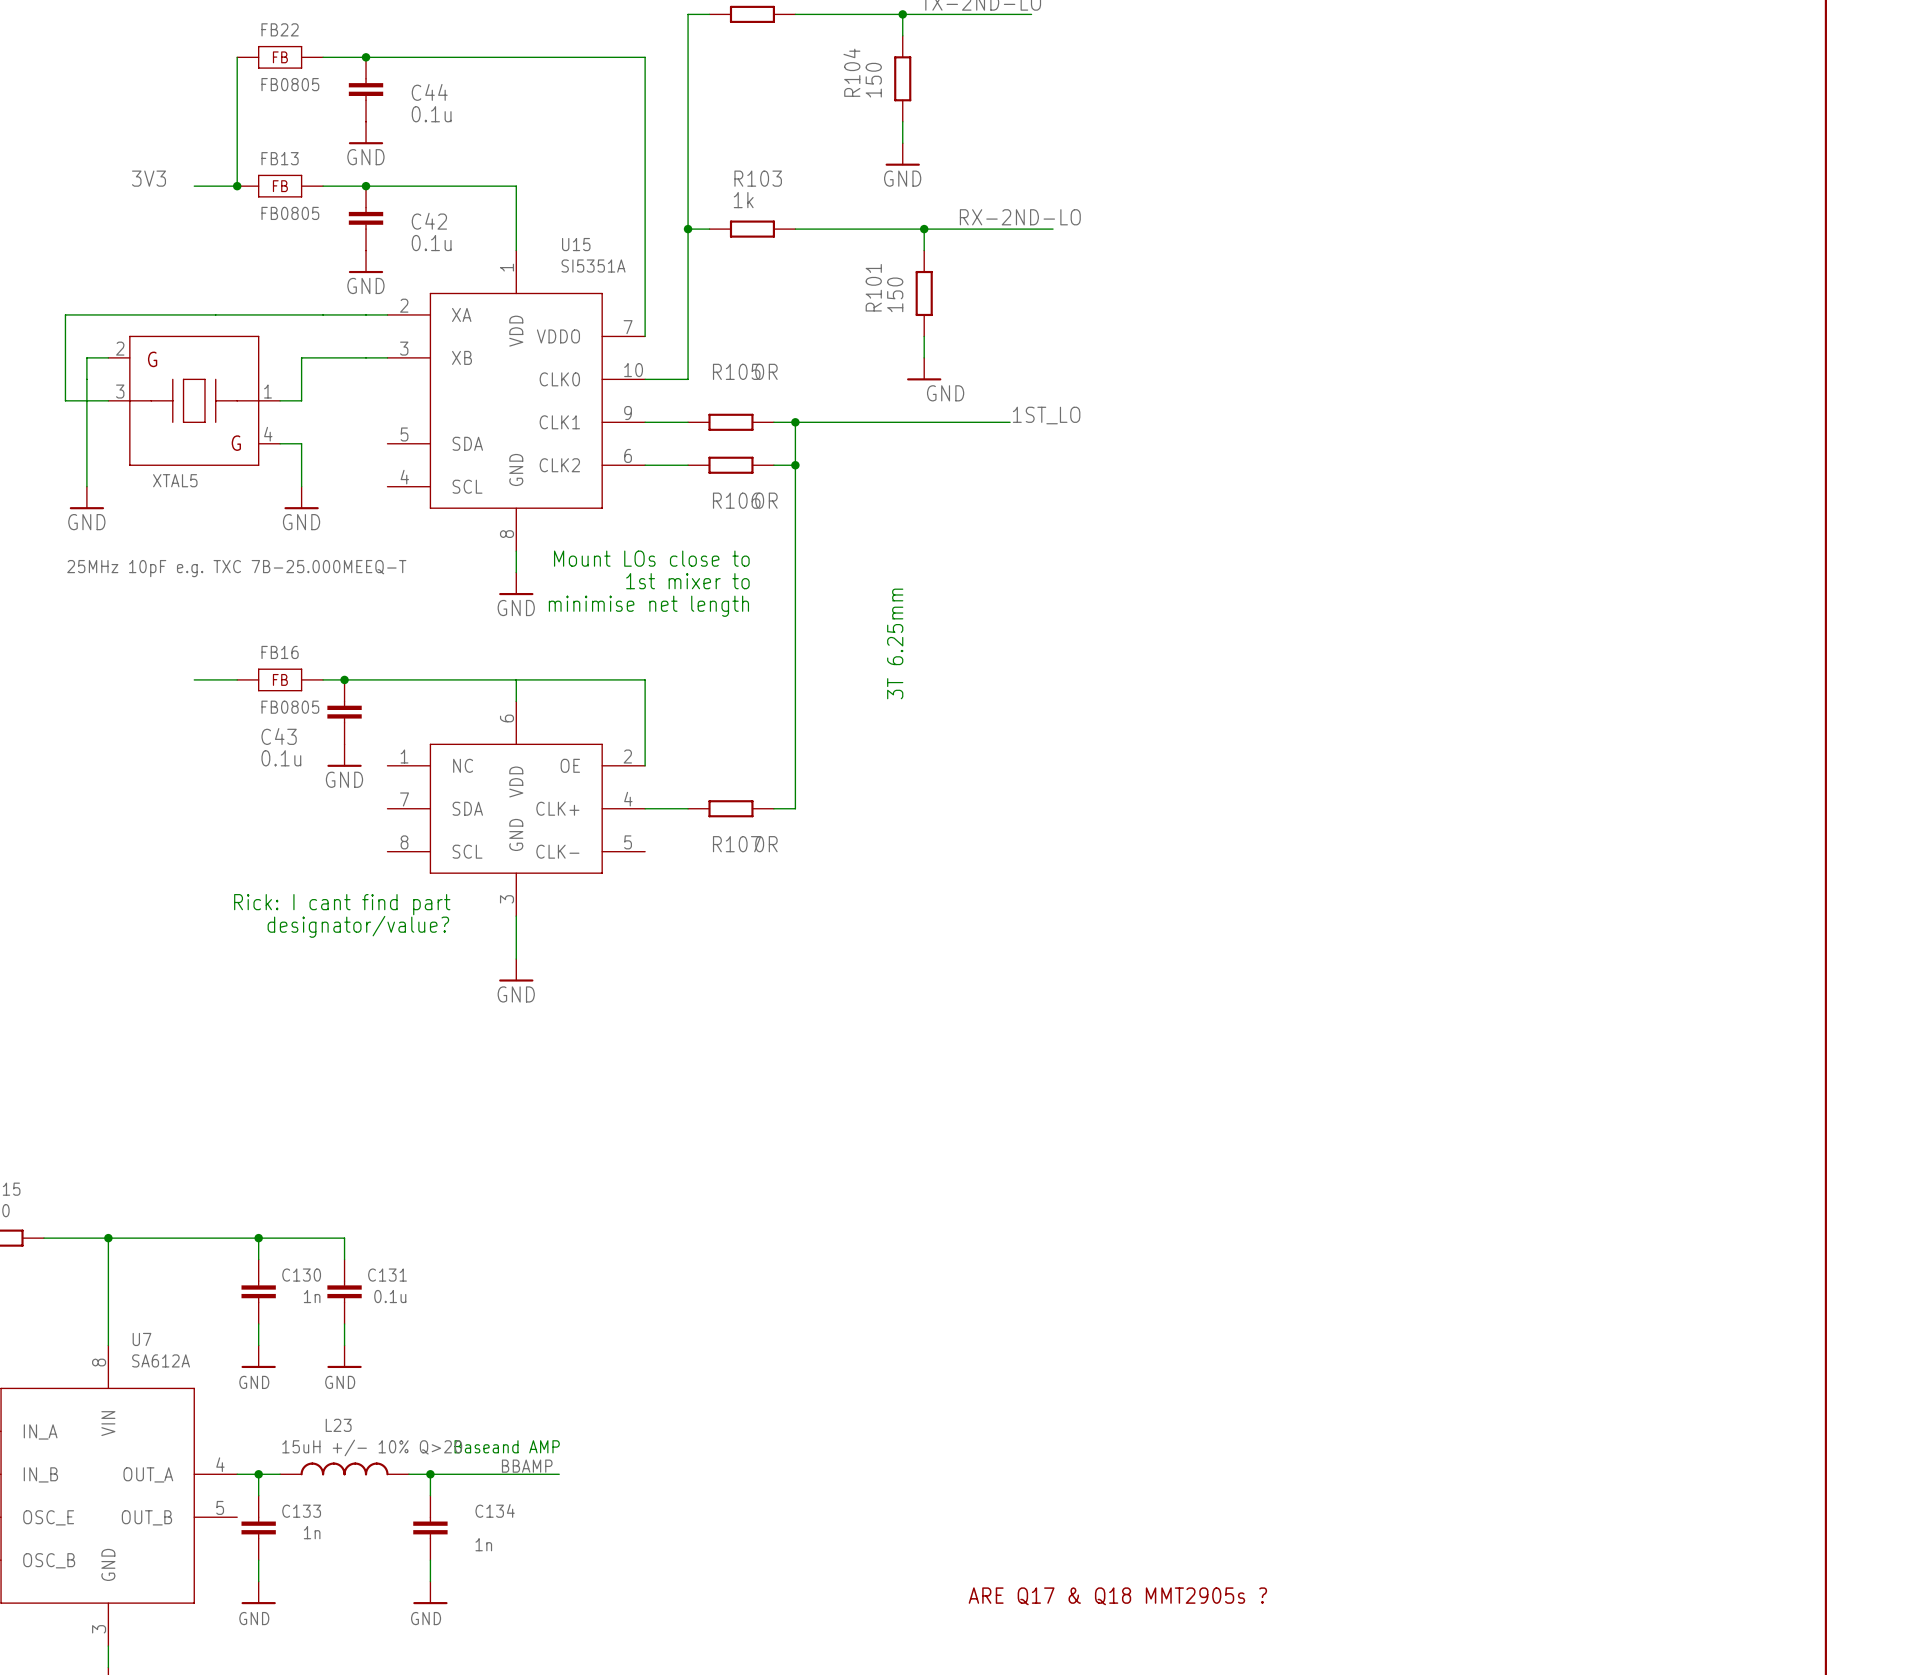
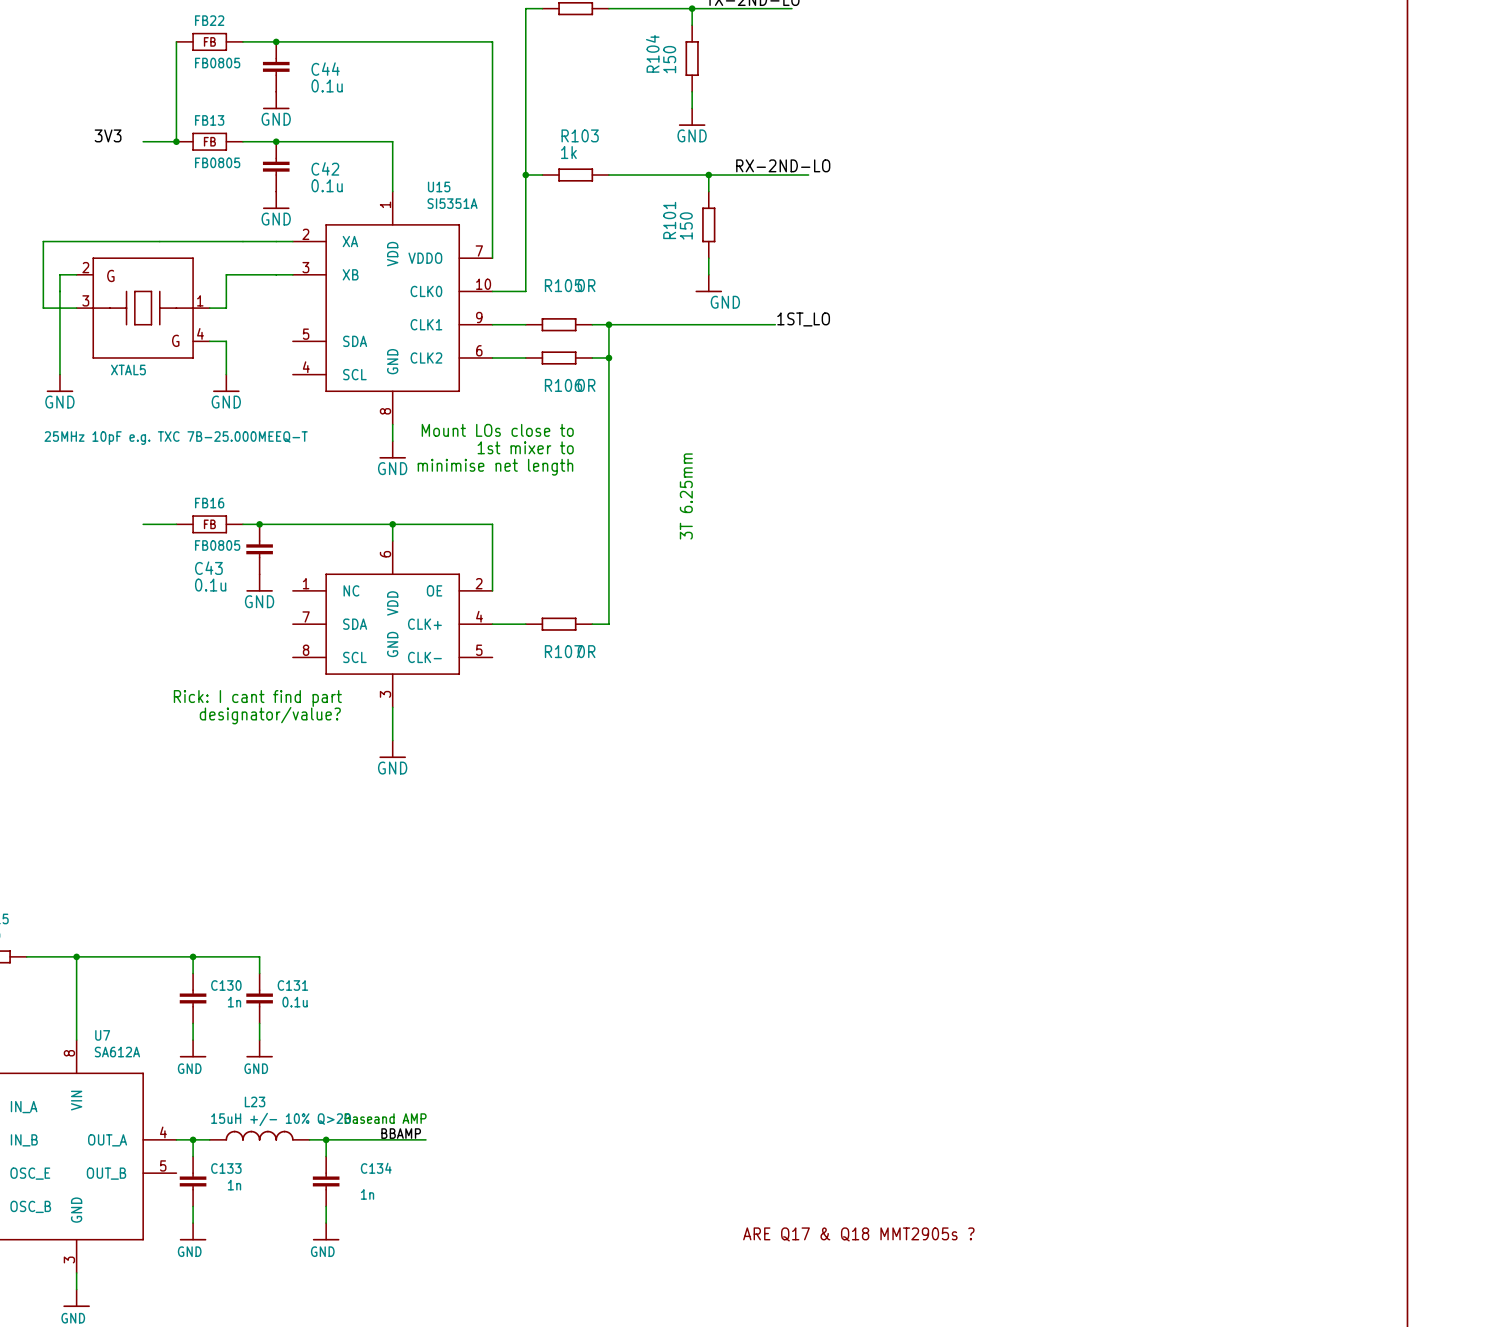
junction: none -> (392, 524)

